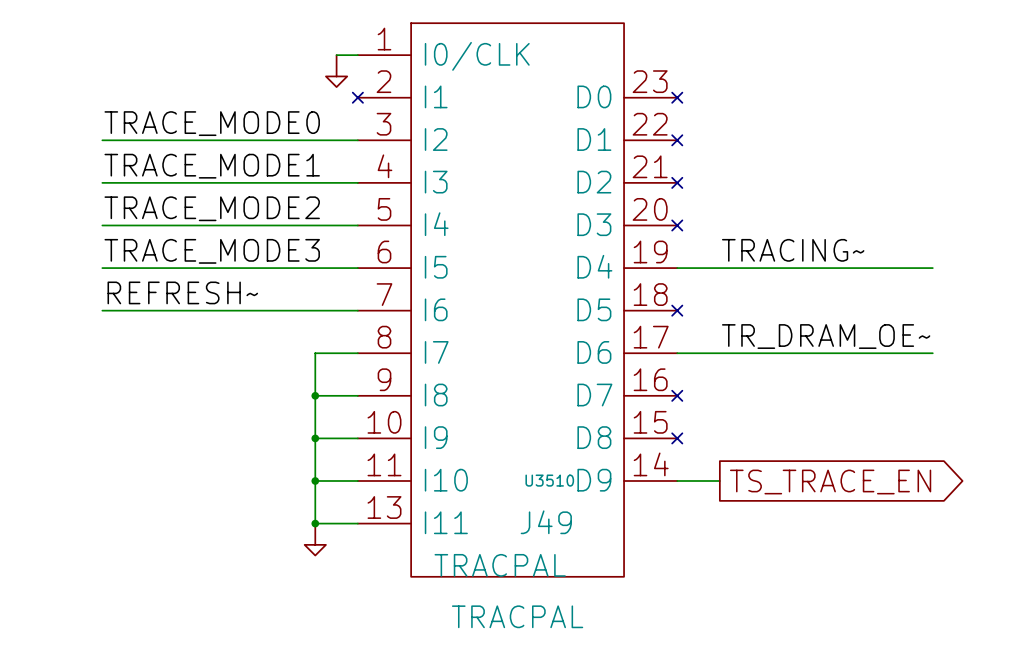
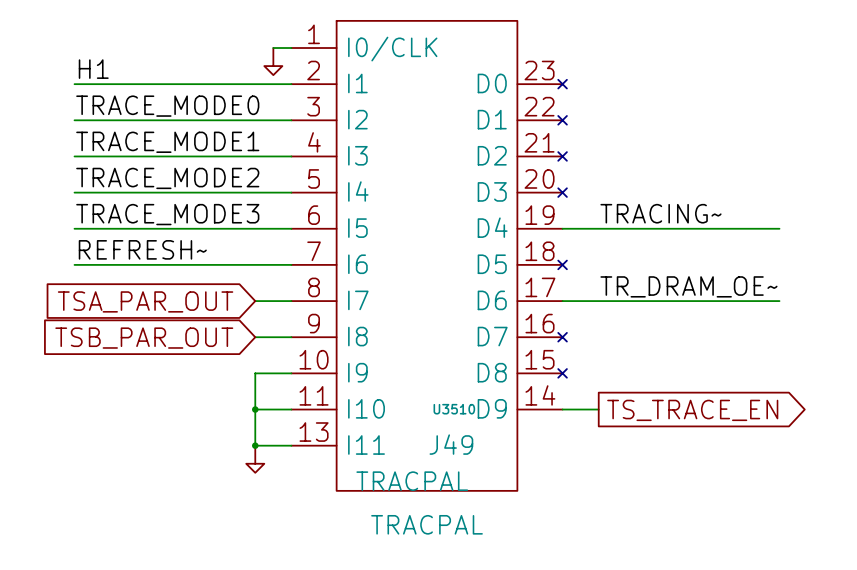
label: none -> H1 (93, 69)
wire: none -> (74, 84) (291, 84)
no-connect mark: (357, 97) -> none
wire: (315, 353) (315, 438) -> none
global label: none -> TSA_PAR_OUT (145, 301)
junction: (315, 395) -> none
global label: none -> TSB_PAR_OUT (144, 338)
junction: (315, 438) -> none

